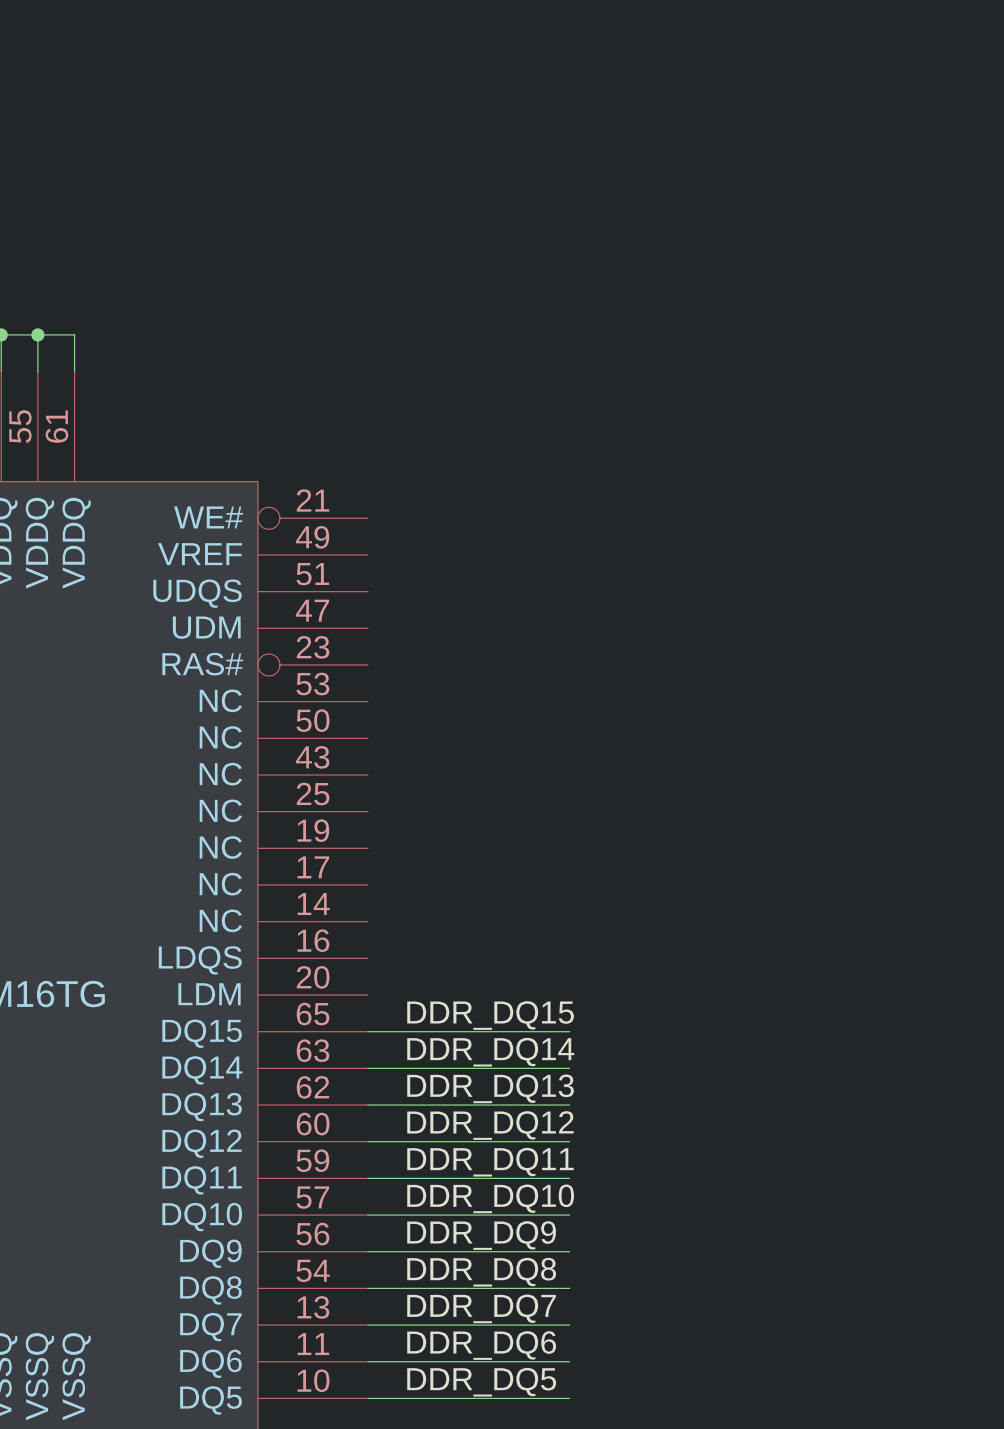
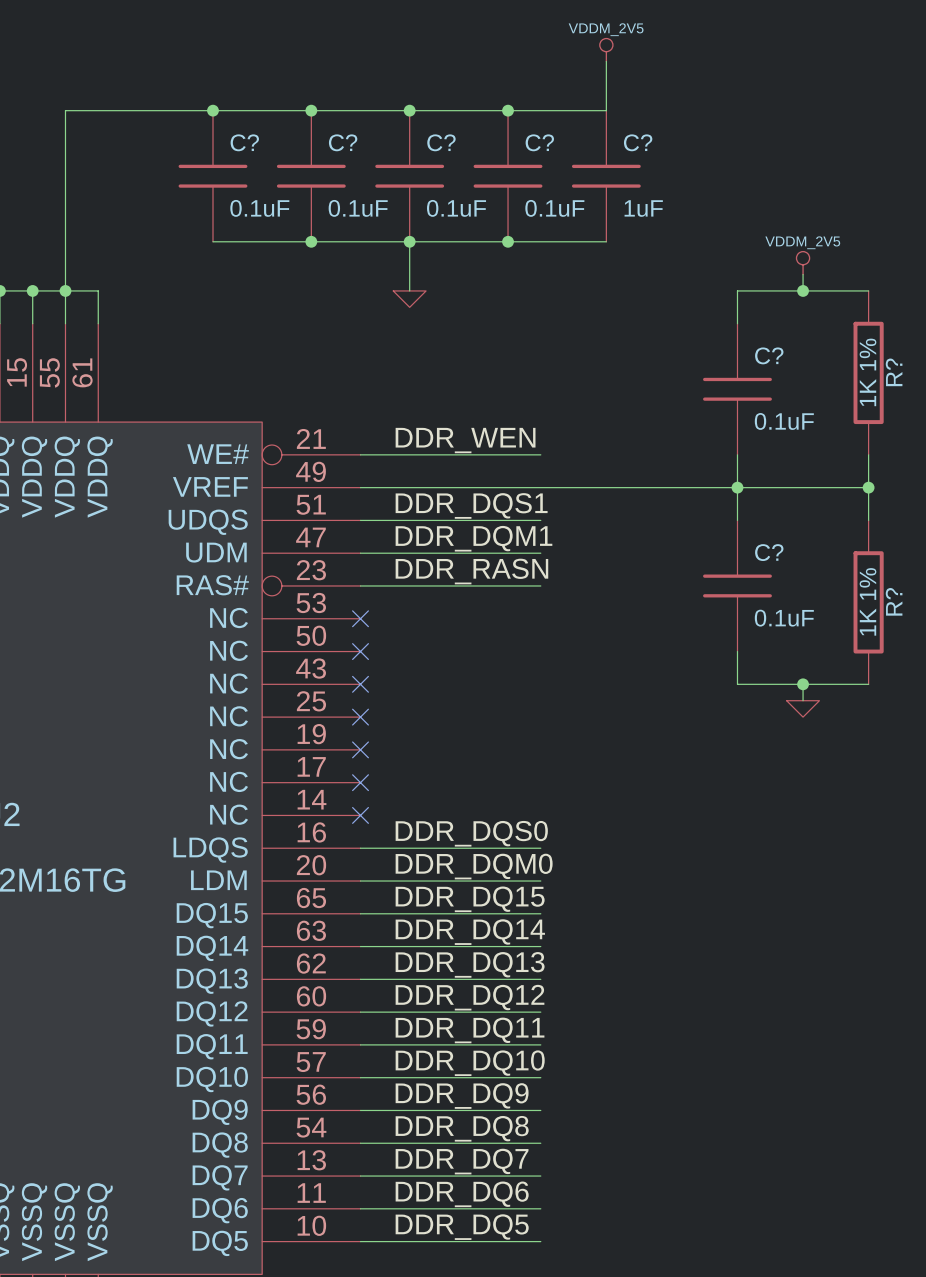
power symbol: none -> VDDM_2V5 (606, 50)
wire: none -> (606, 61) (606, 110) (65, 110) (65, 290)
junction: none -> (212, 110)
junction: none -> (311, 110)
junction: none -> (409, 110)
junction: none -> (508, 110)
C?: none -> 0.1uF (212, 176)
C?: none -> 0.1uF (311, 176)
C?: none -> 0.1uF (409, 176)
C?: none -> 0.1uF (508, 176)
C?: none -> 1uF (606, 176)
wire: none -> (212, 241) (606, 241)
junction: none -> (311, 241)
wire: none -> (409, 241) (409, 290)
junction: none -> (409, 241)
junction: none -> (508, 241)
power symbol: none -> VDDM_2V5 (803, 263)
wire: none -> (803, 274) (803, 290)
junction: none -> (803, 290)
wire: none -> (868, 290) (737, 290) (737, 323)
power symbol: none -> (409, 299)
R?: none -> 1K 1% (868, 372)
C?: none -> 0.1uF (737, 389)
label: none -> DDR_WEN (465, 440)
wire: none -> (360, 454) (540, 454)
wire: none -> (737, 454) (737, 520)
wire: none -> (868, 454) (868, 520)
wire: none -> (360, 487) (868, 487)
junction: none -> (737, 487)
junction: none -> (868, 487)
label: none -> DDR_DQS1 (471, 505)
wire: none -> (360, 520) (540, 520)
label: none -> DDR_DQM1 (473, 538)
wire: none -> (360, 553) (540, 553)
label: none -> DDR_RASN (471, 571)
wire: none -> (360, 585) (540, 585)
C?: none -> 0.1uF (737, 585)
R?: none -> 1K 1% (868, 602)
no-connect mark: none -> (360, 618)
no-connect mark: none -> (360, 651)
wire: none -> (737, 651) (737, 684) (868, 684)
no-connect mark: none -> (360, 684)
wire: none -> (803, 684) (803, 700)
junction: none -> (803, 684)
power symbol: none -> (803, 708)
no-connect mark: none -> (360, 717)
no-connect mark: none -> (360, 749)
no-connect mark: none -> (360, 782)
no-connect mark: none -> (360, 815)
label: none -> DDR_DQS0 (471, 833)
wire: none -> (360, 848) (540, 848)
label: none -> DDR_DQM0 (474, 866)
wire: none -> (360, 881) (540, 881)

